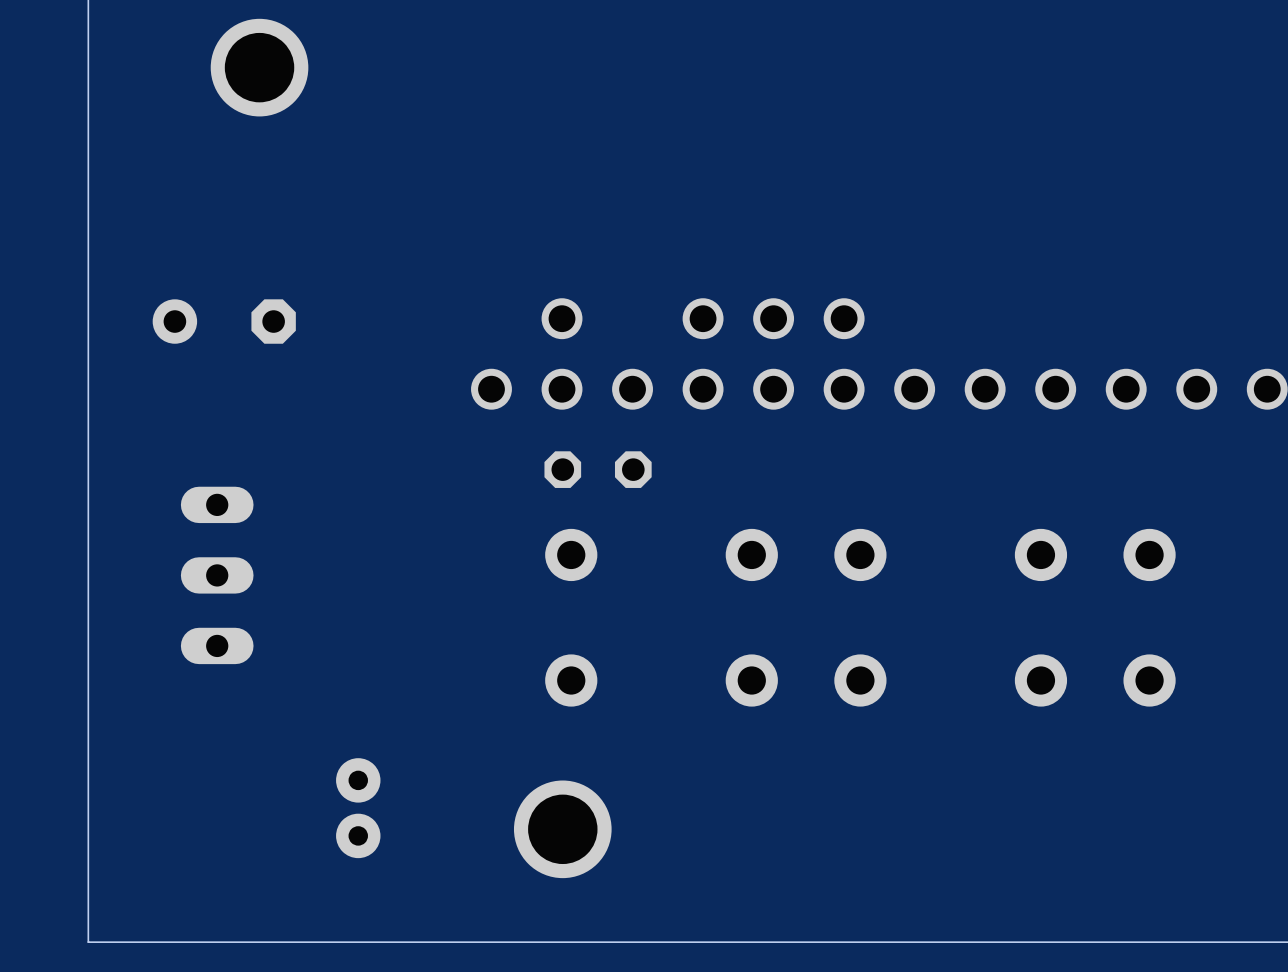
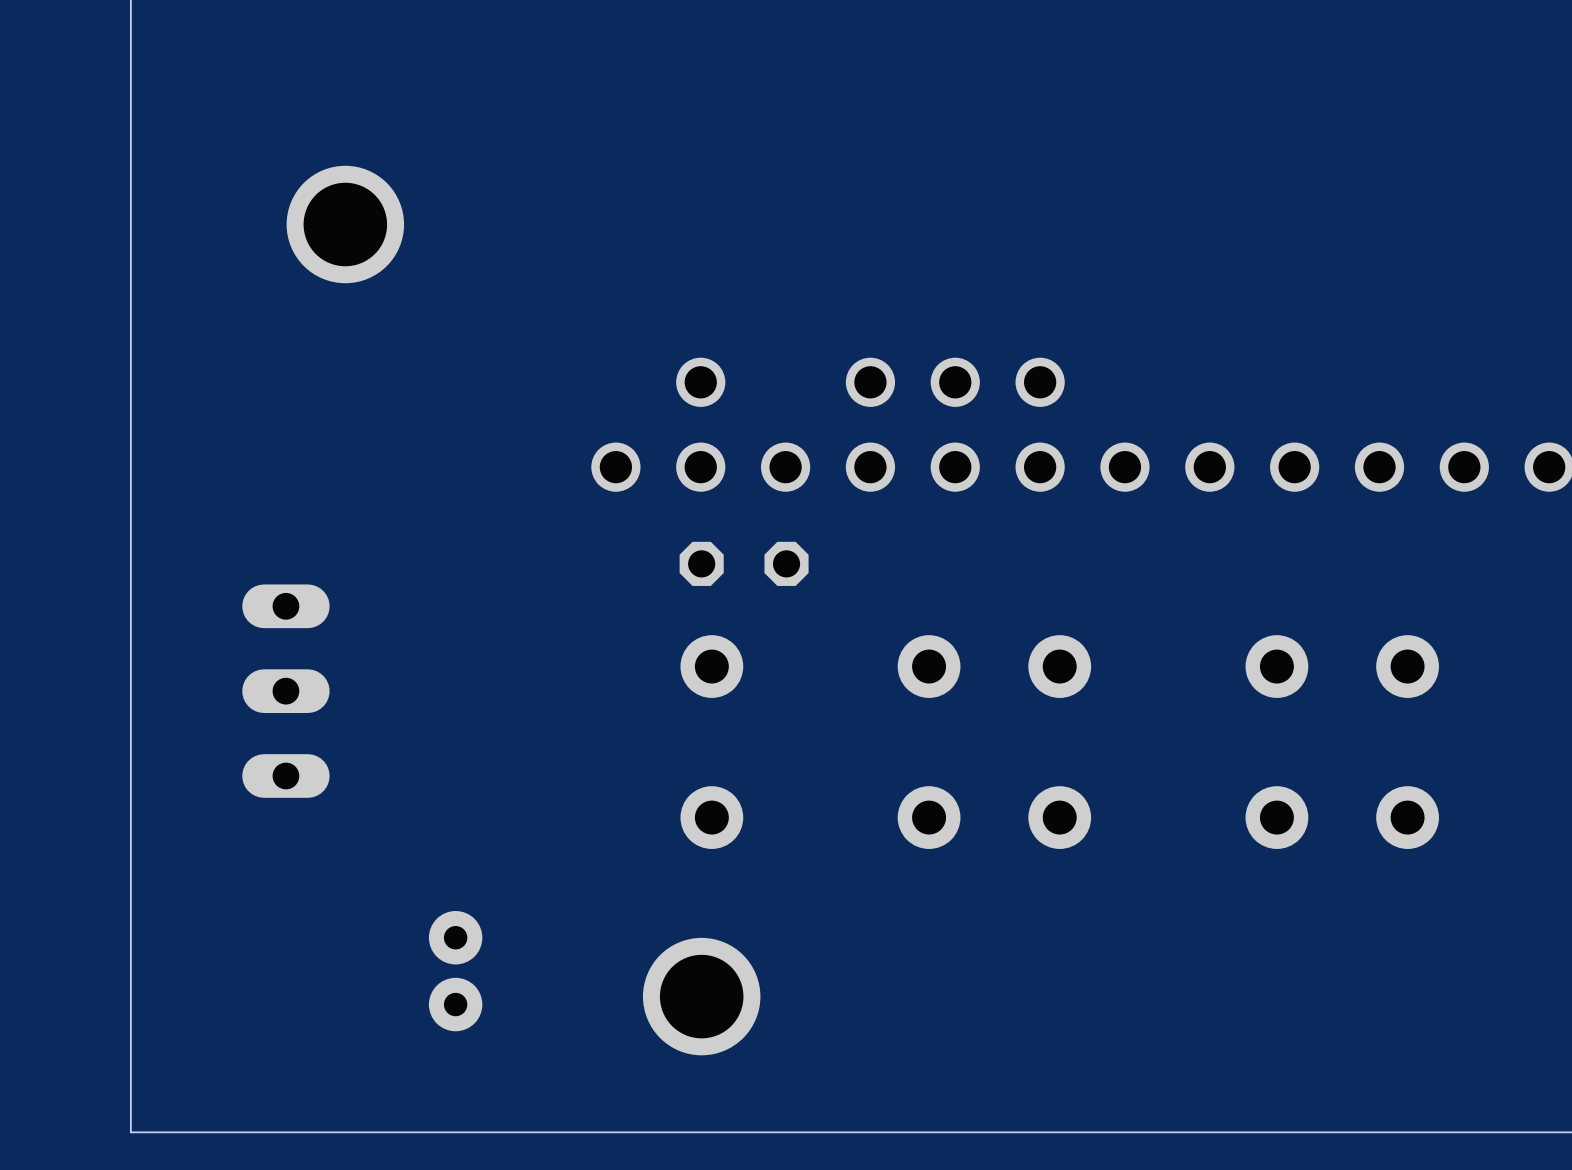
part position: (259, 67) -> (345, 224)
part: (224, 321) -> none

